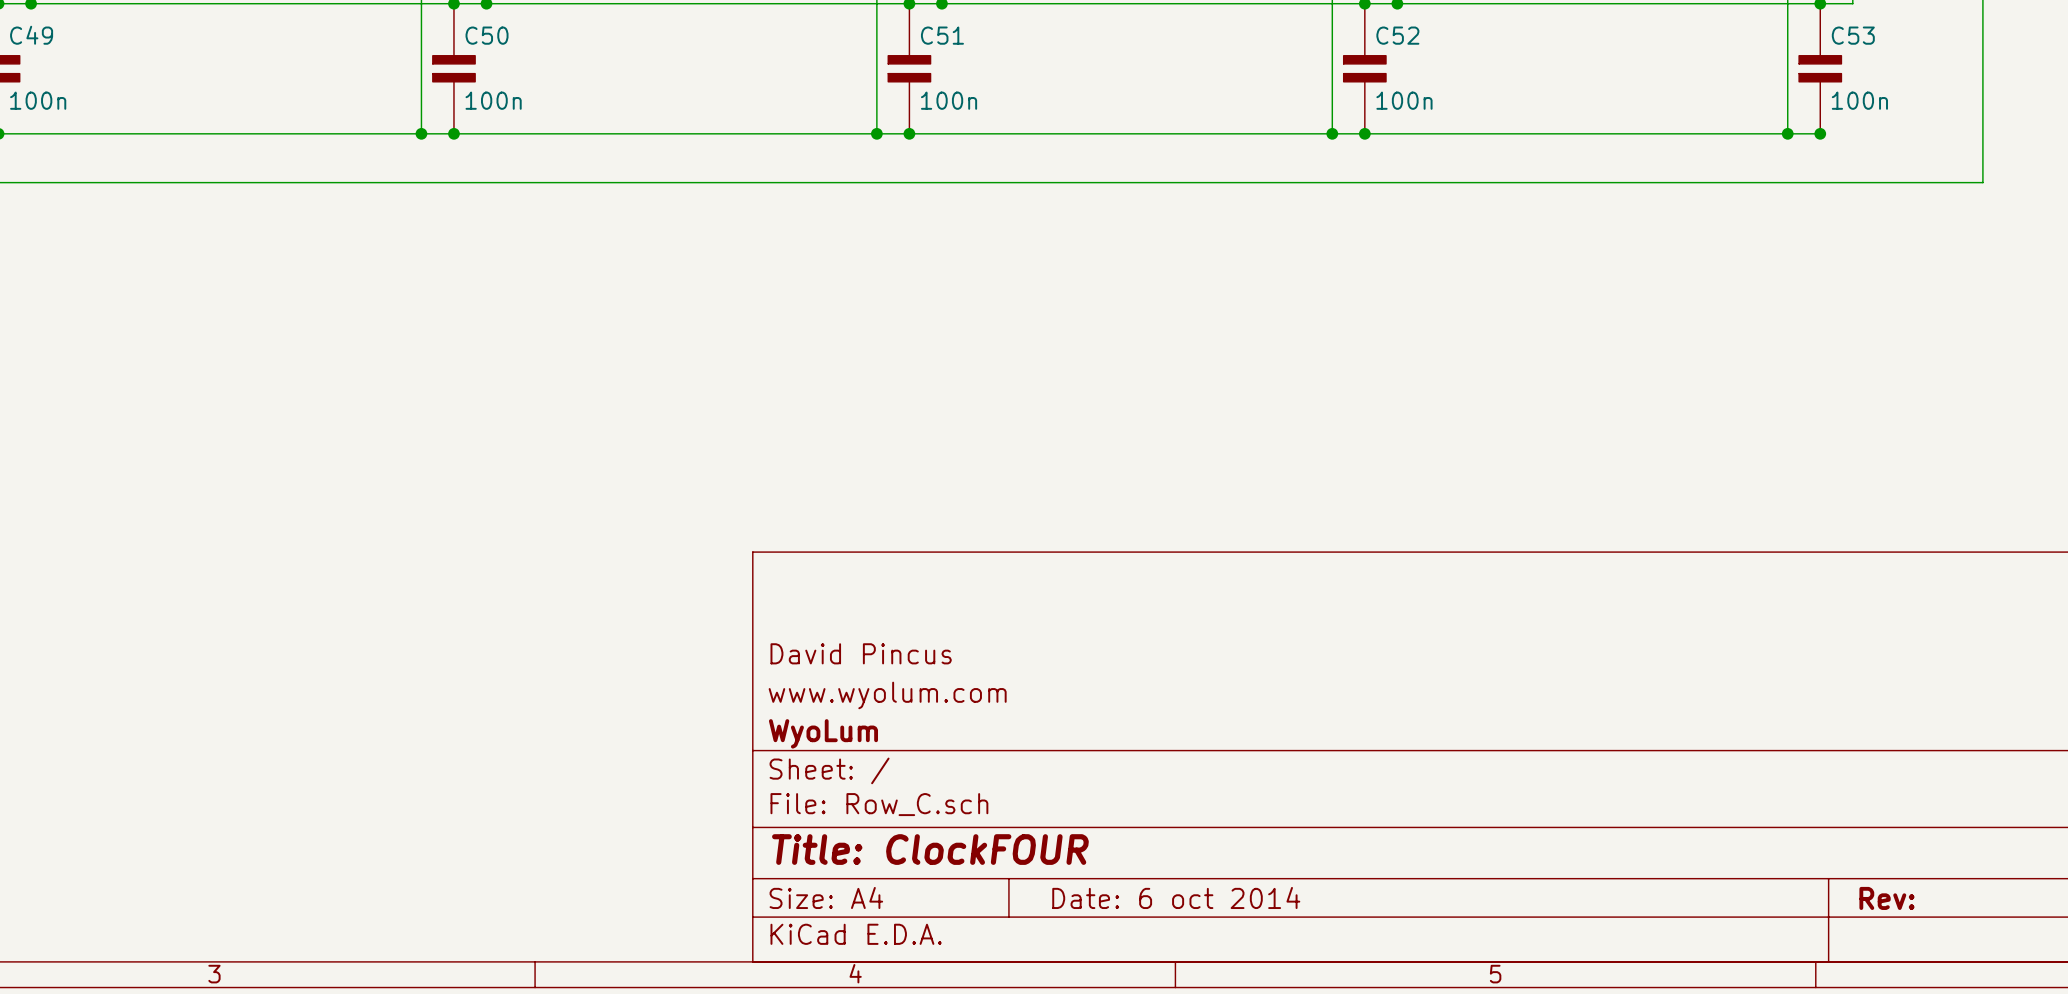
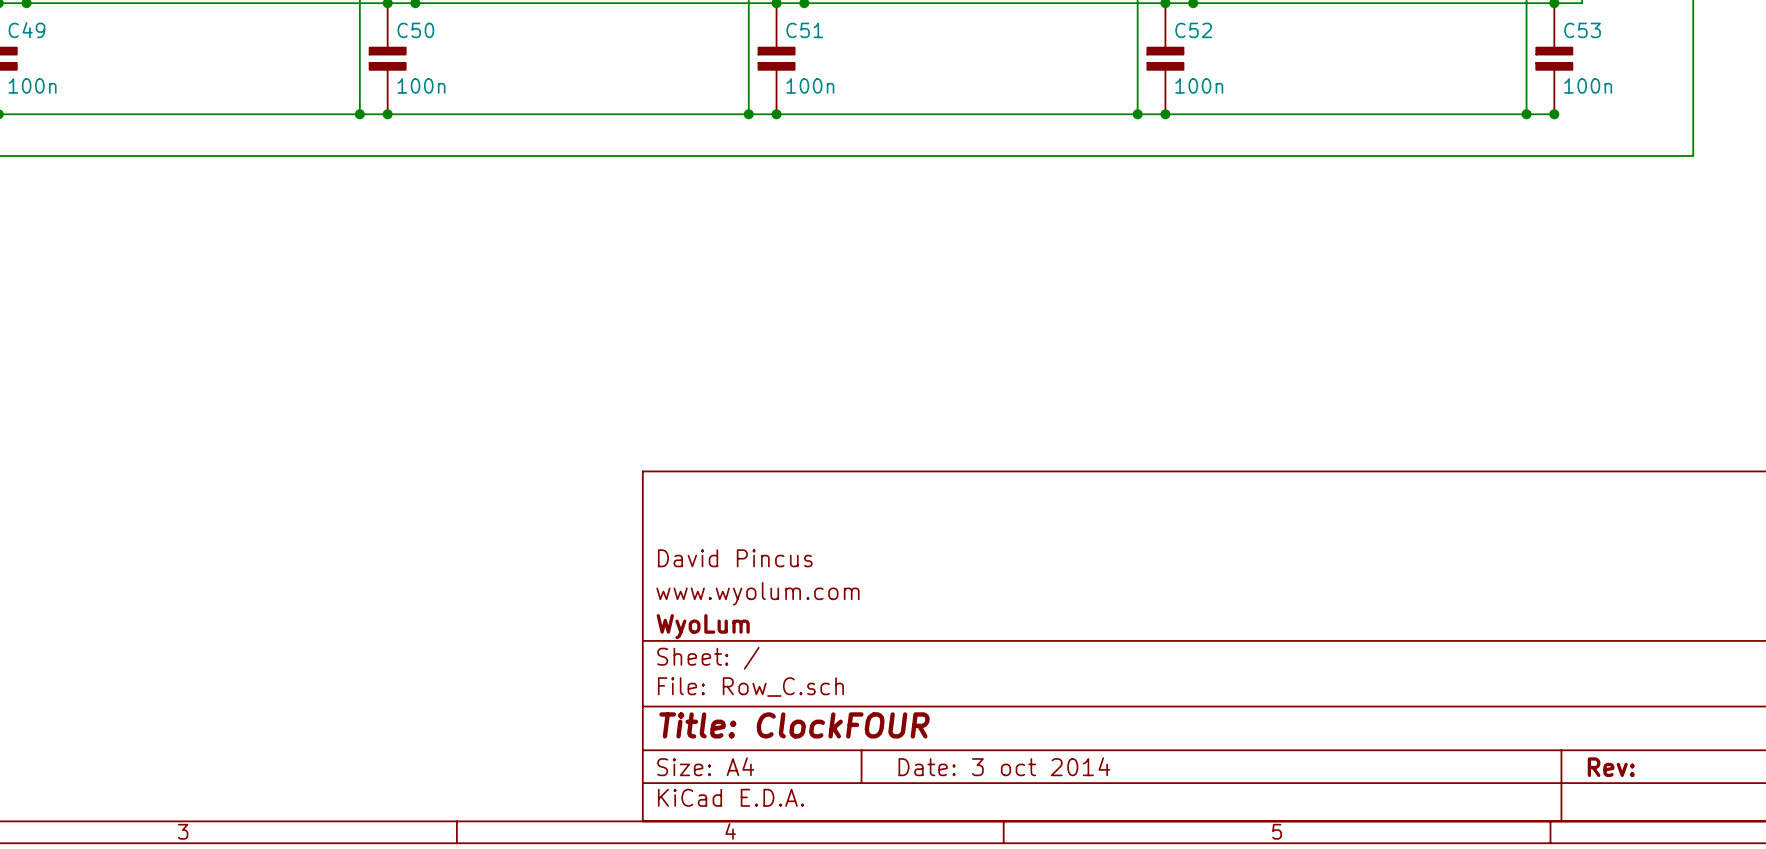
title block: Date: 6 oct 2014 (1176, 897) -> Date: 3 oct 2014 (1004, 766)

